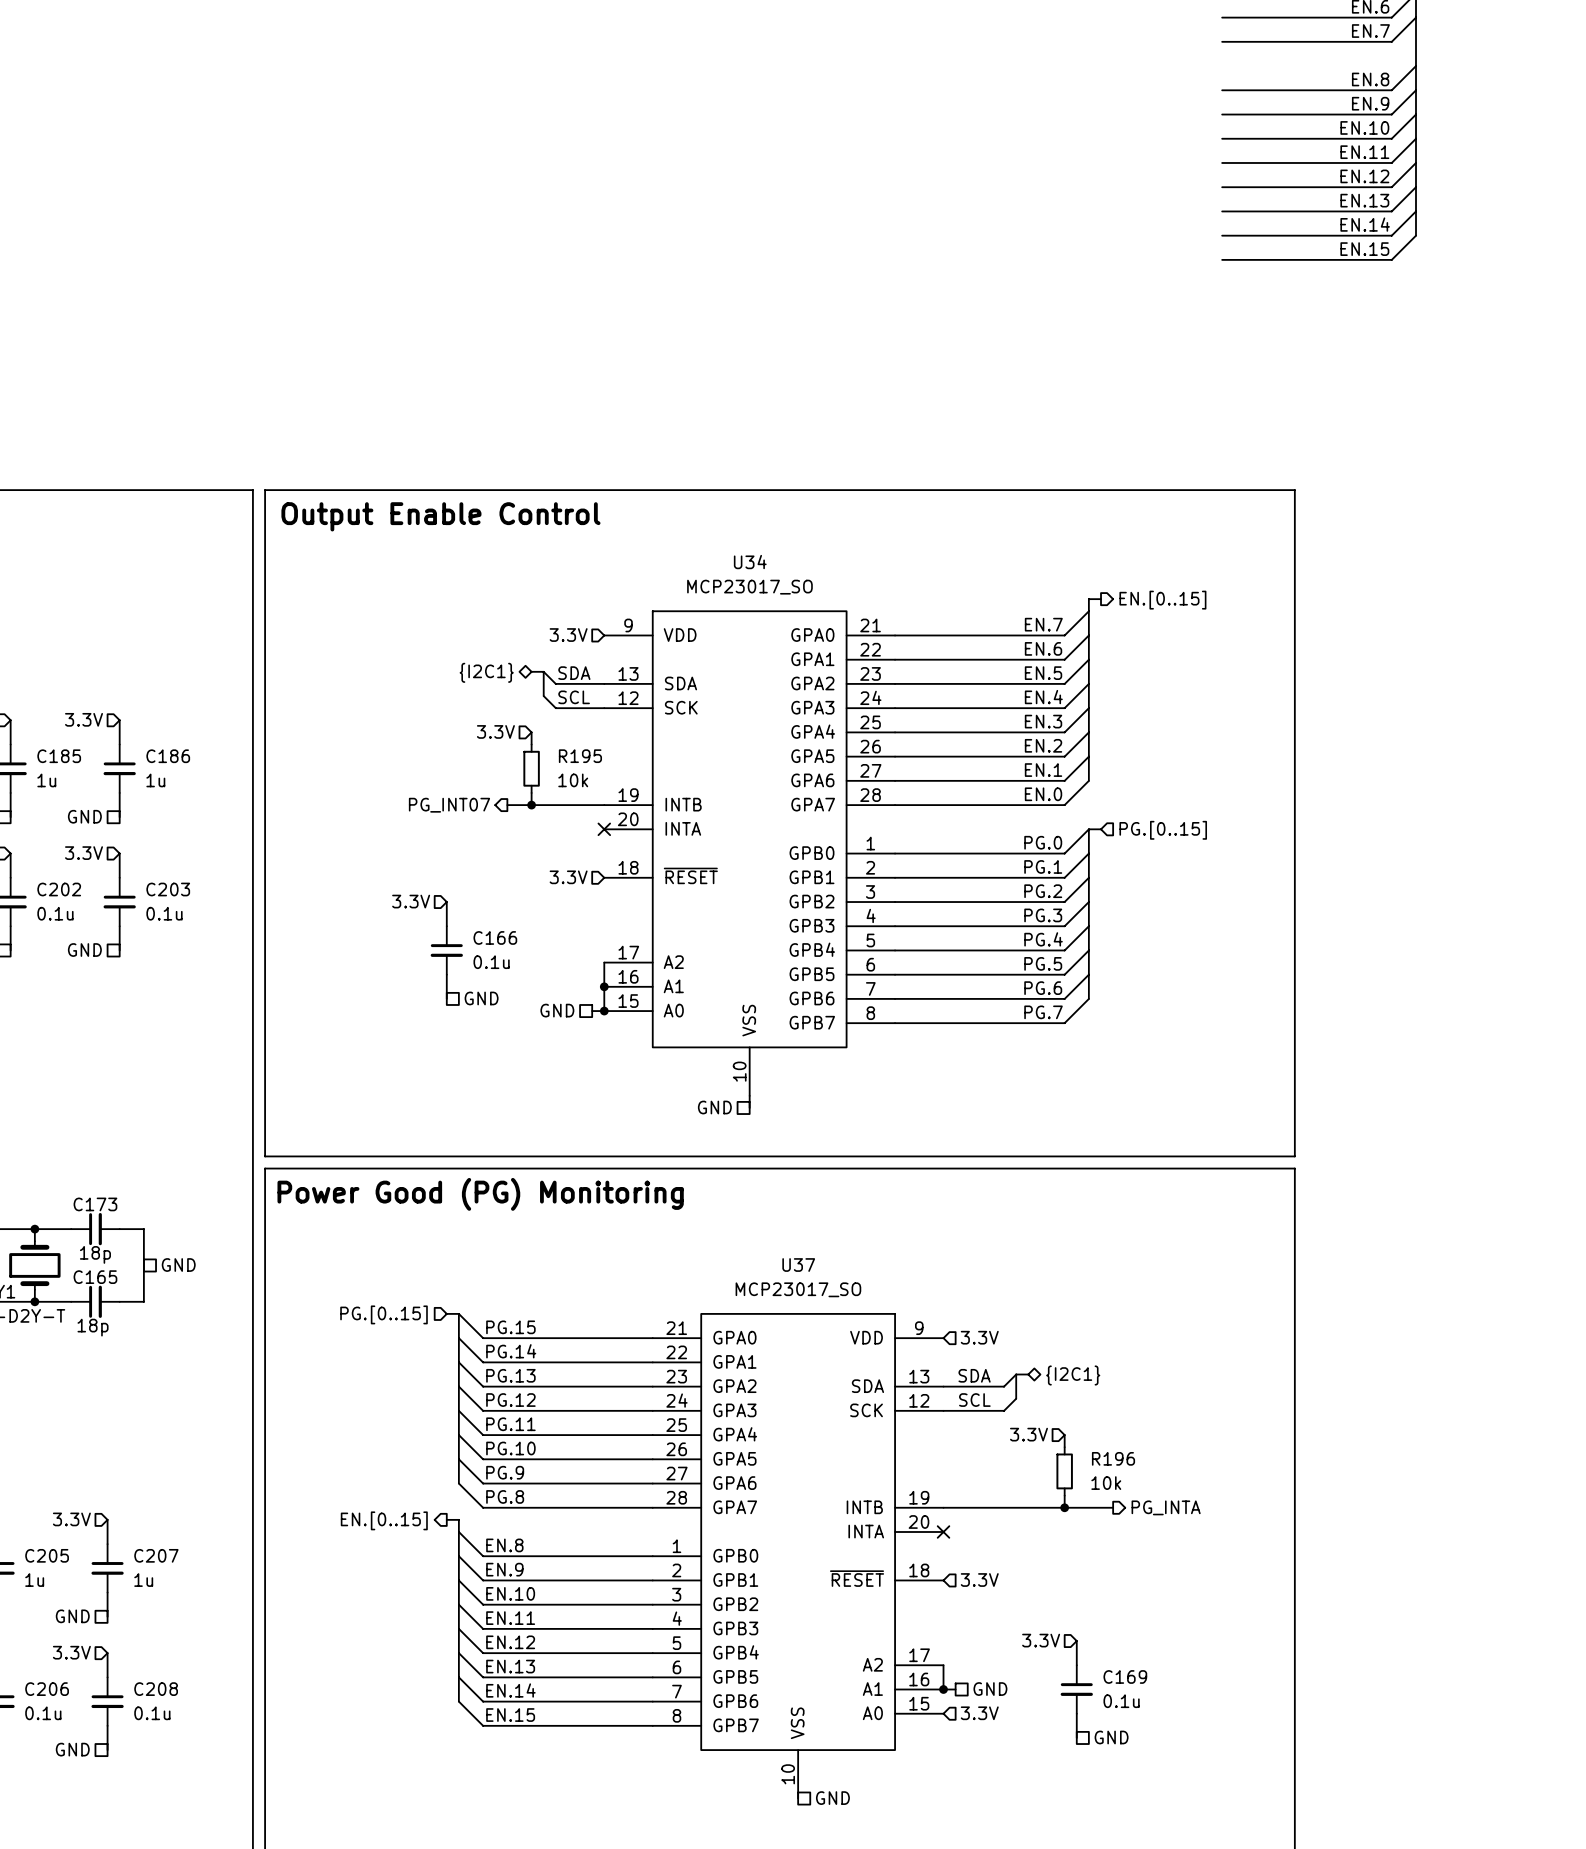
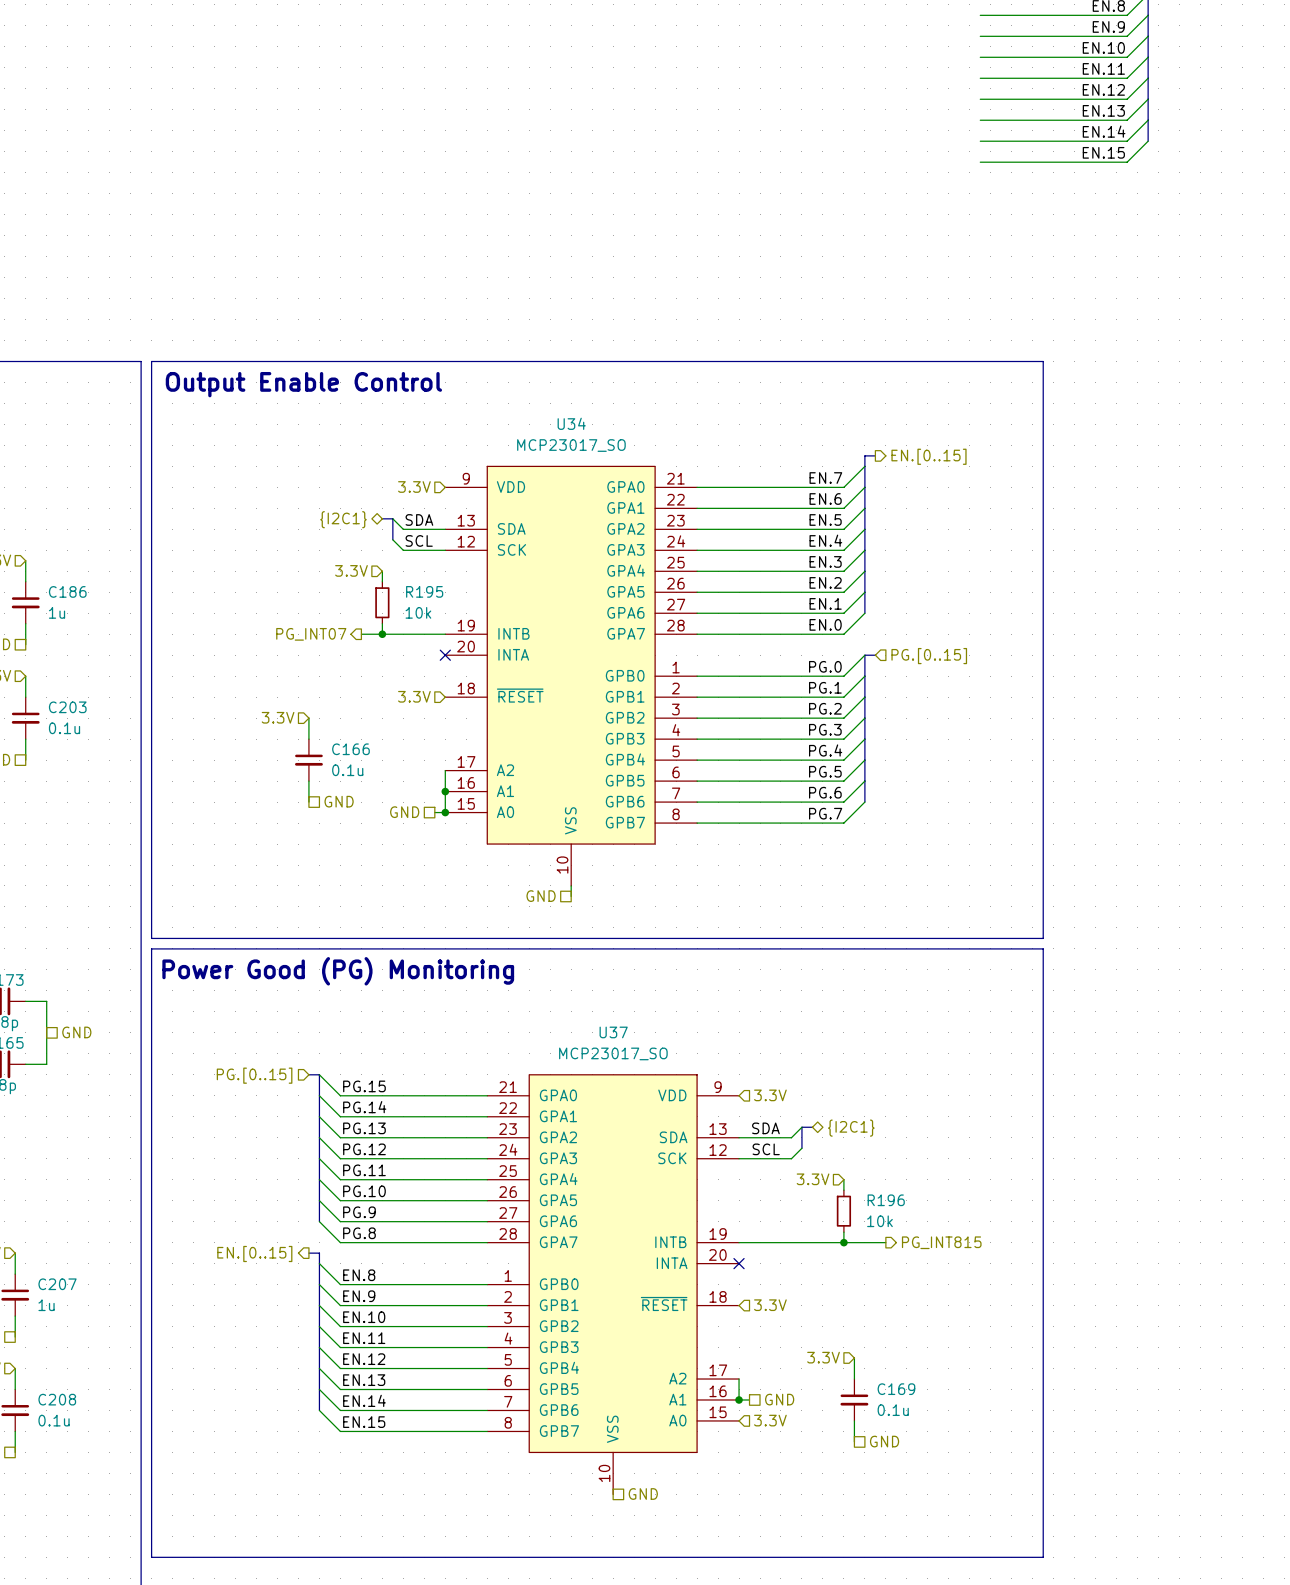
hierarchical label: PG_INTA (1166, 1507) -> PG_INT815 (941, 1242)

